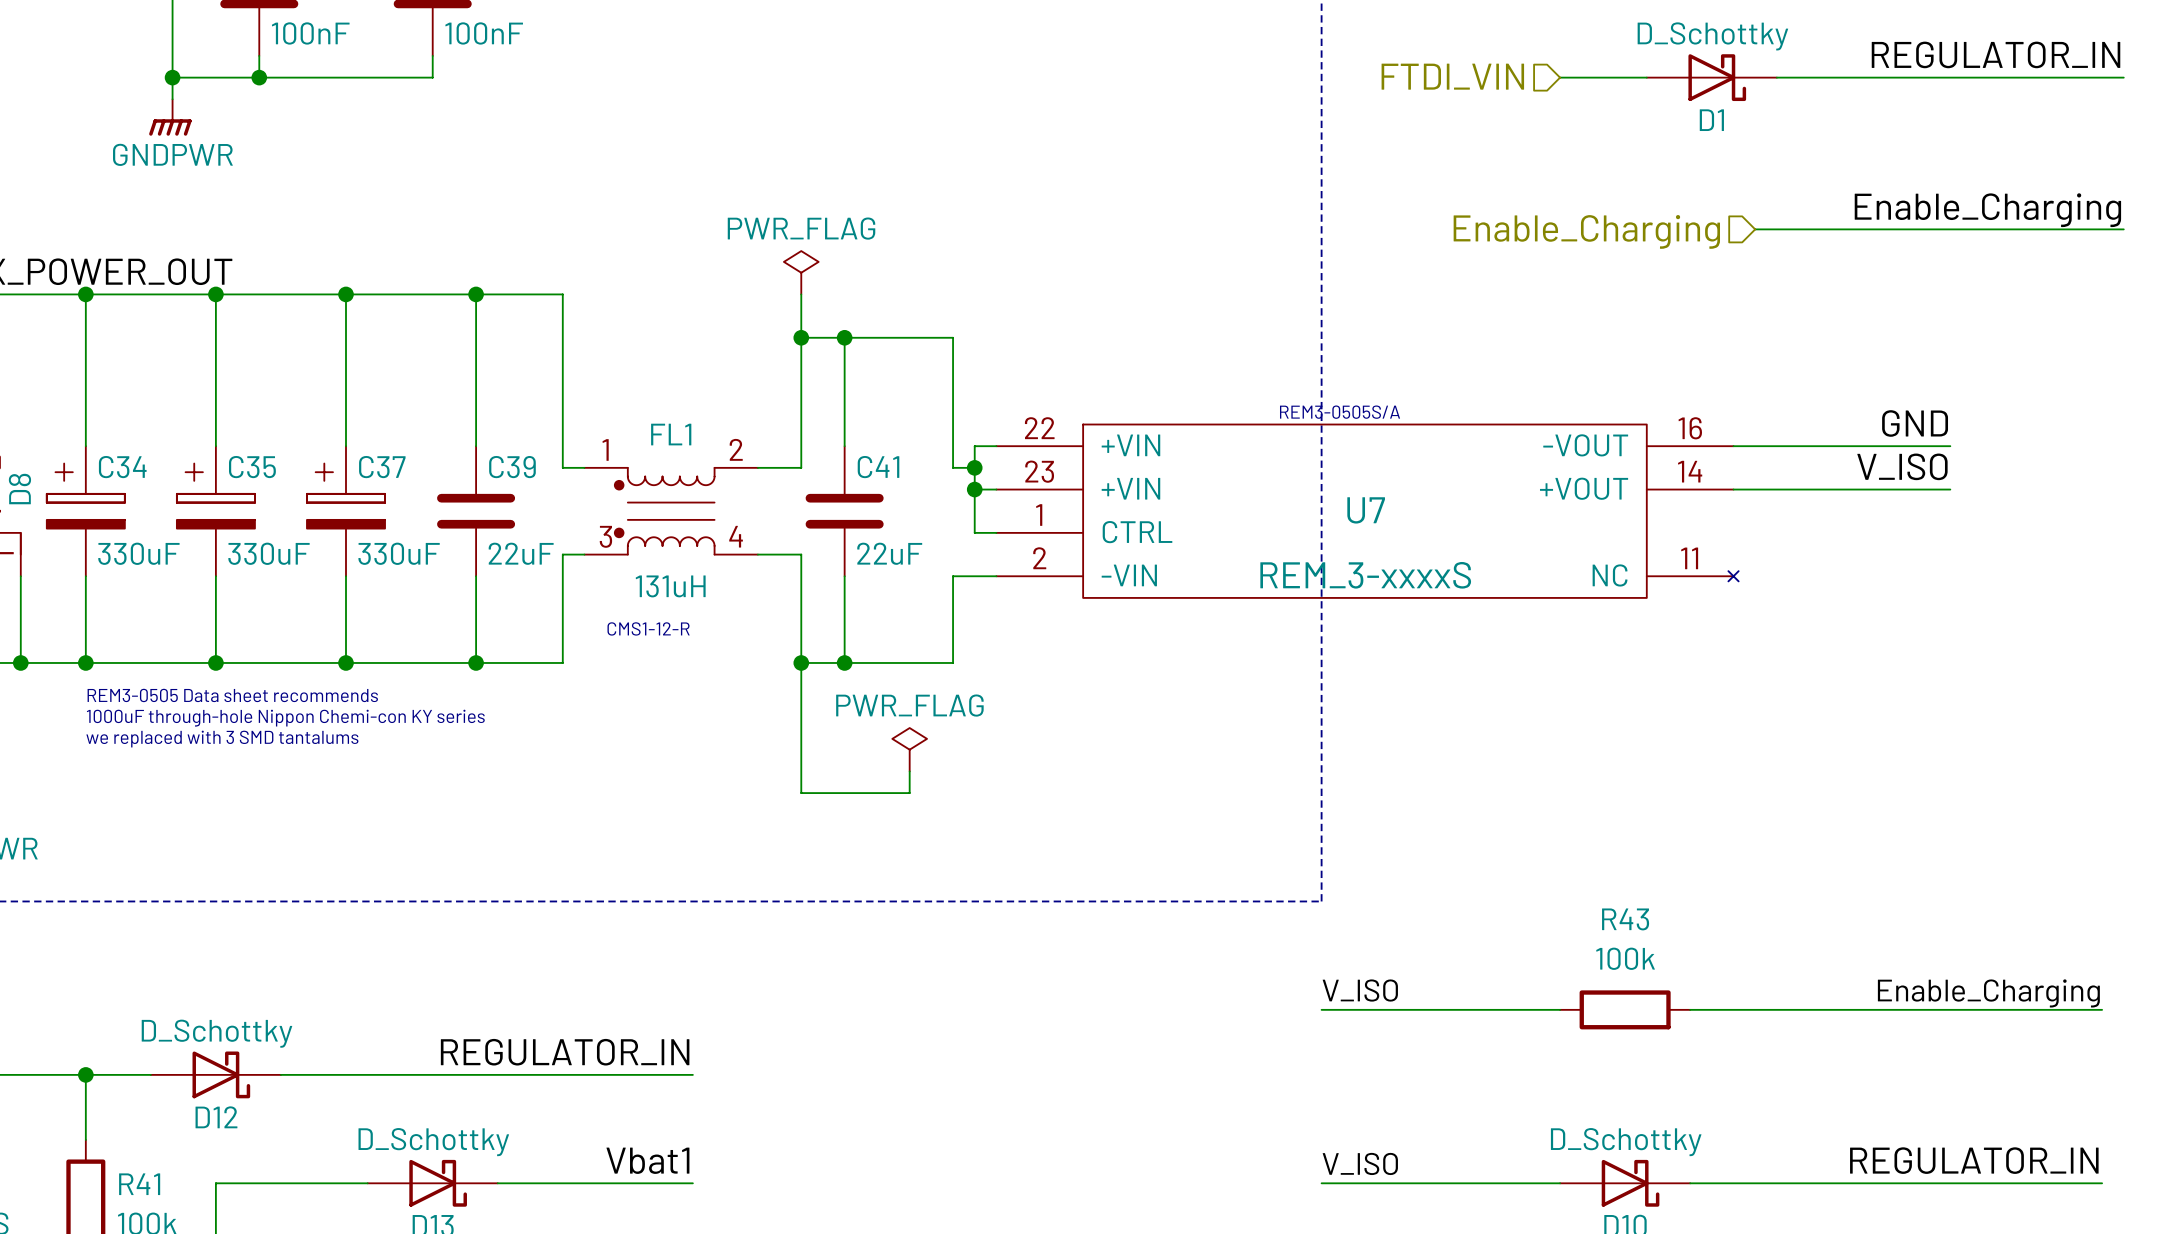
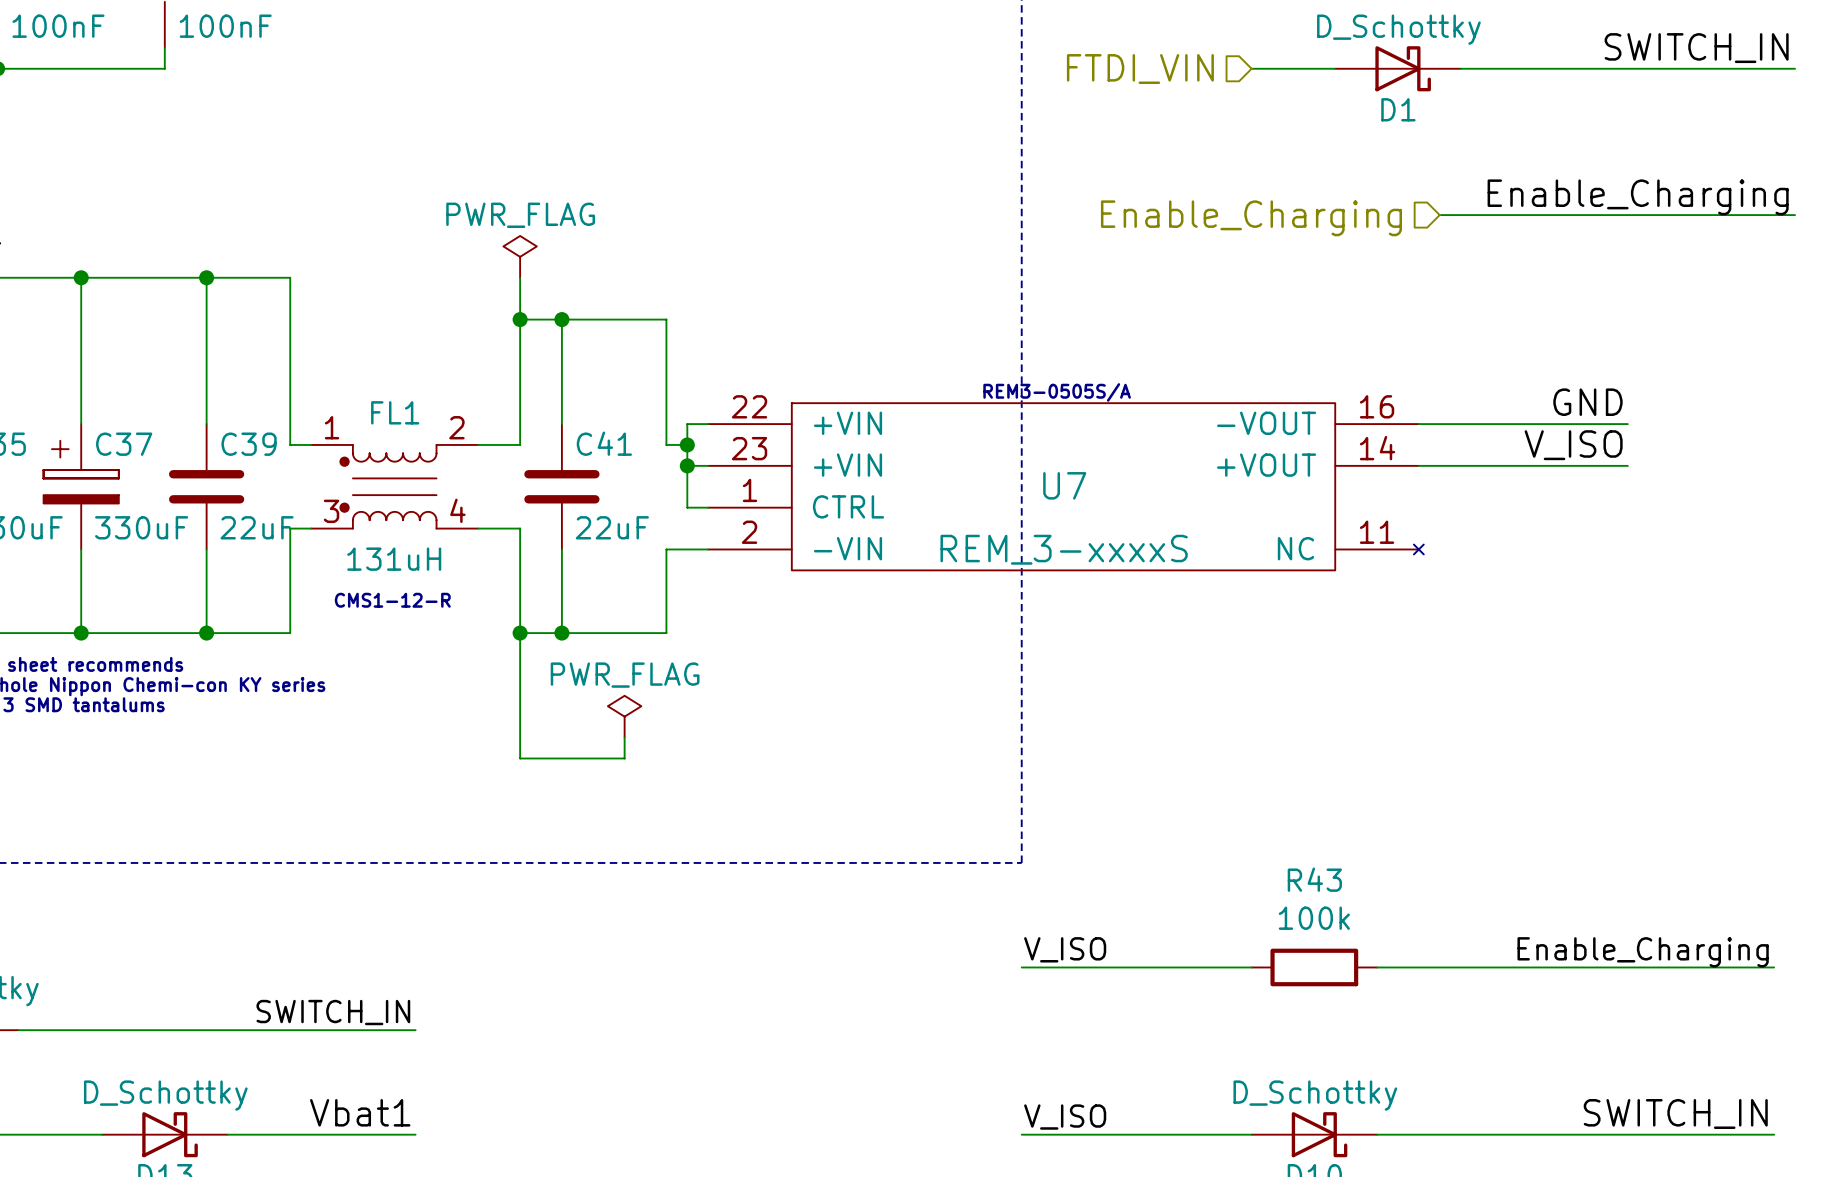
label: REGULATOR_IN (1996, 54) -> SWITCH_IN (1696, 48)
label: REGULATOR_IN (565, 1052) -> SWITCH_IN (333, 1012)
label: REGULATOR_IN (1974, 1160) -> SWITCH_IN (1675, 1114)

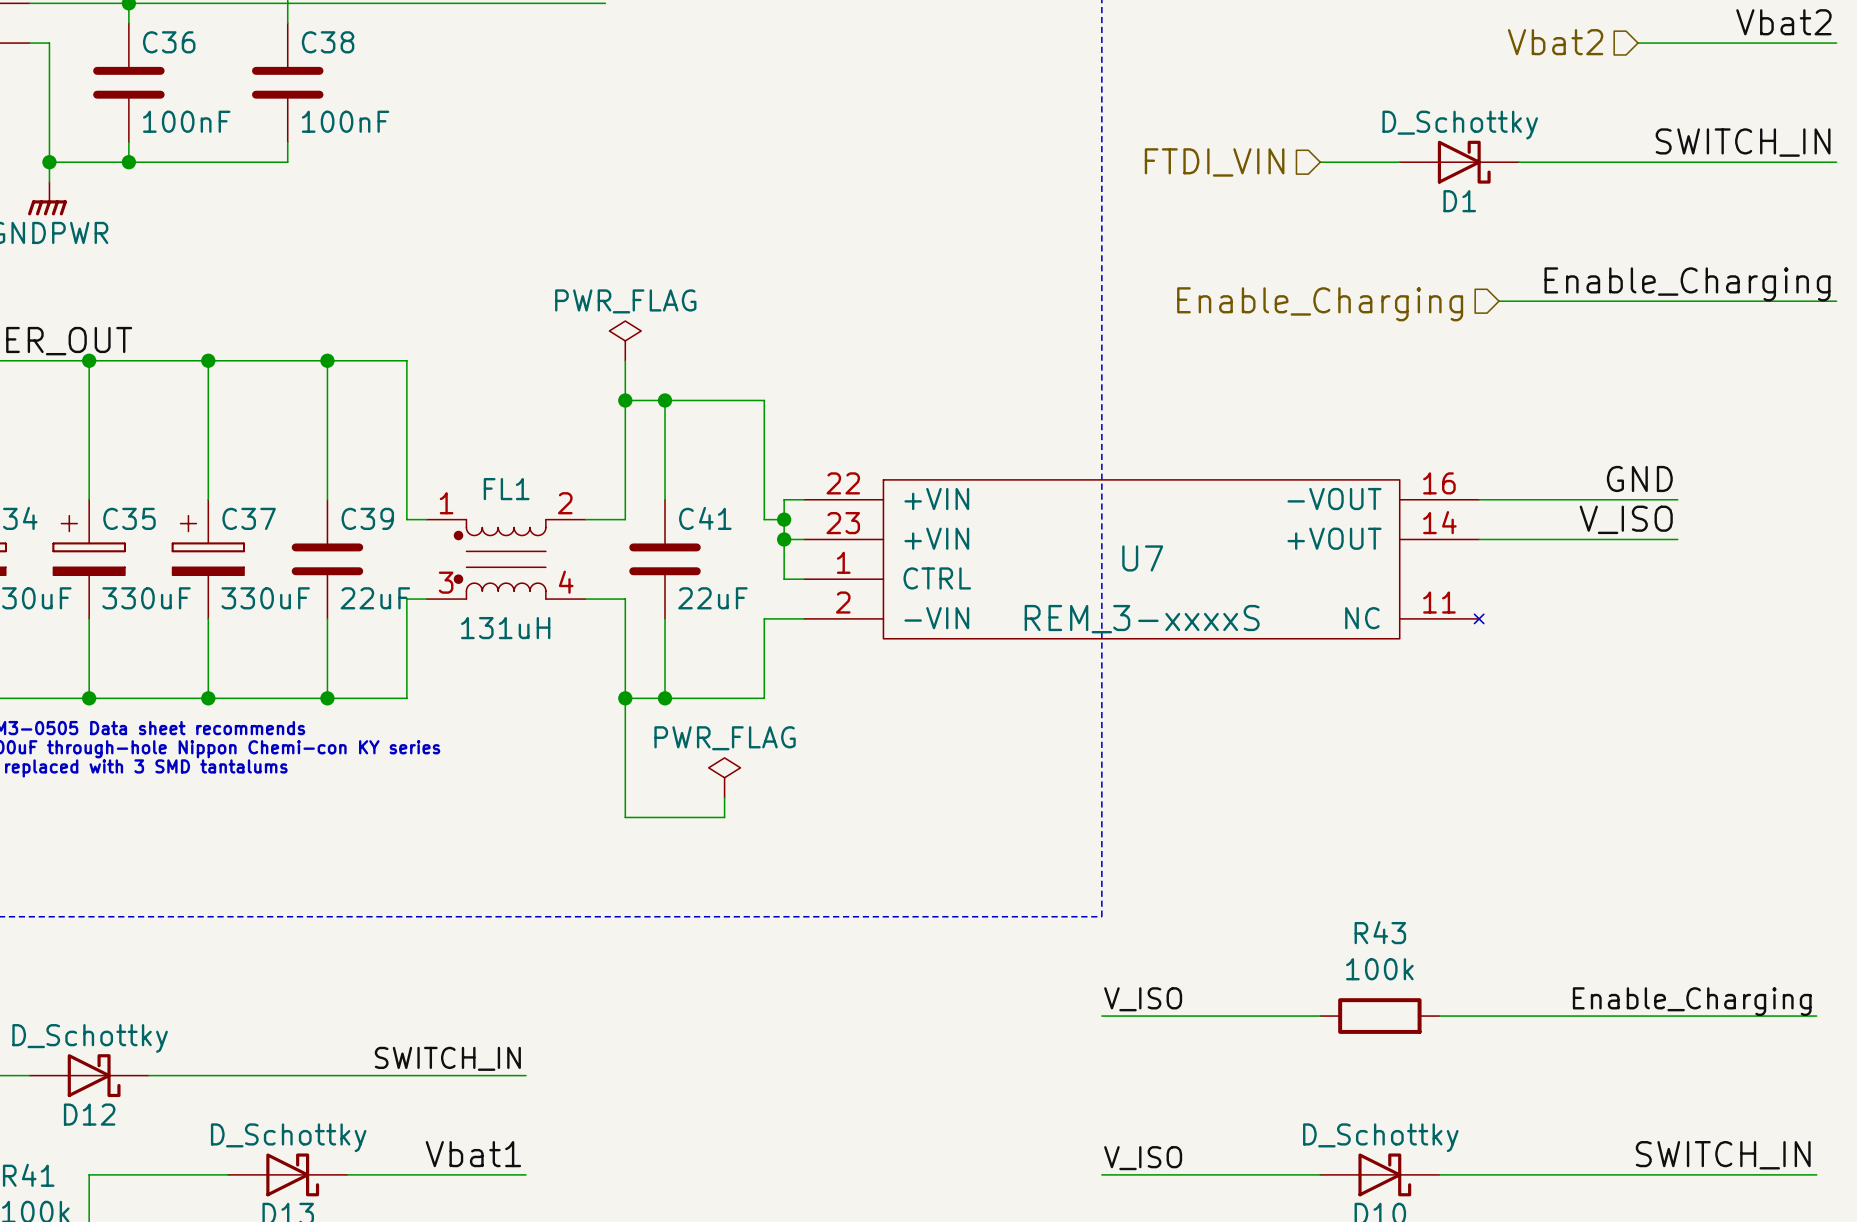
text: REM3-0505S/A (1057, 392) -> none
text: CMS1-12-R (392, 600) -> none

